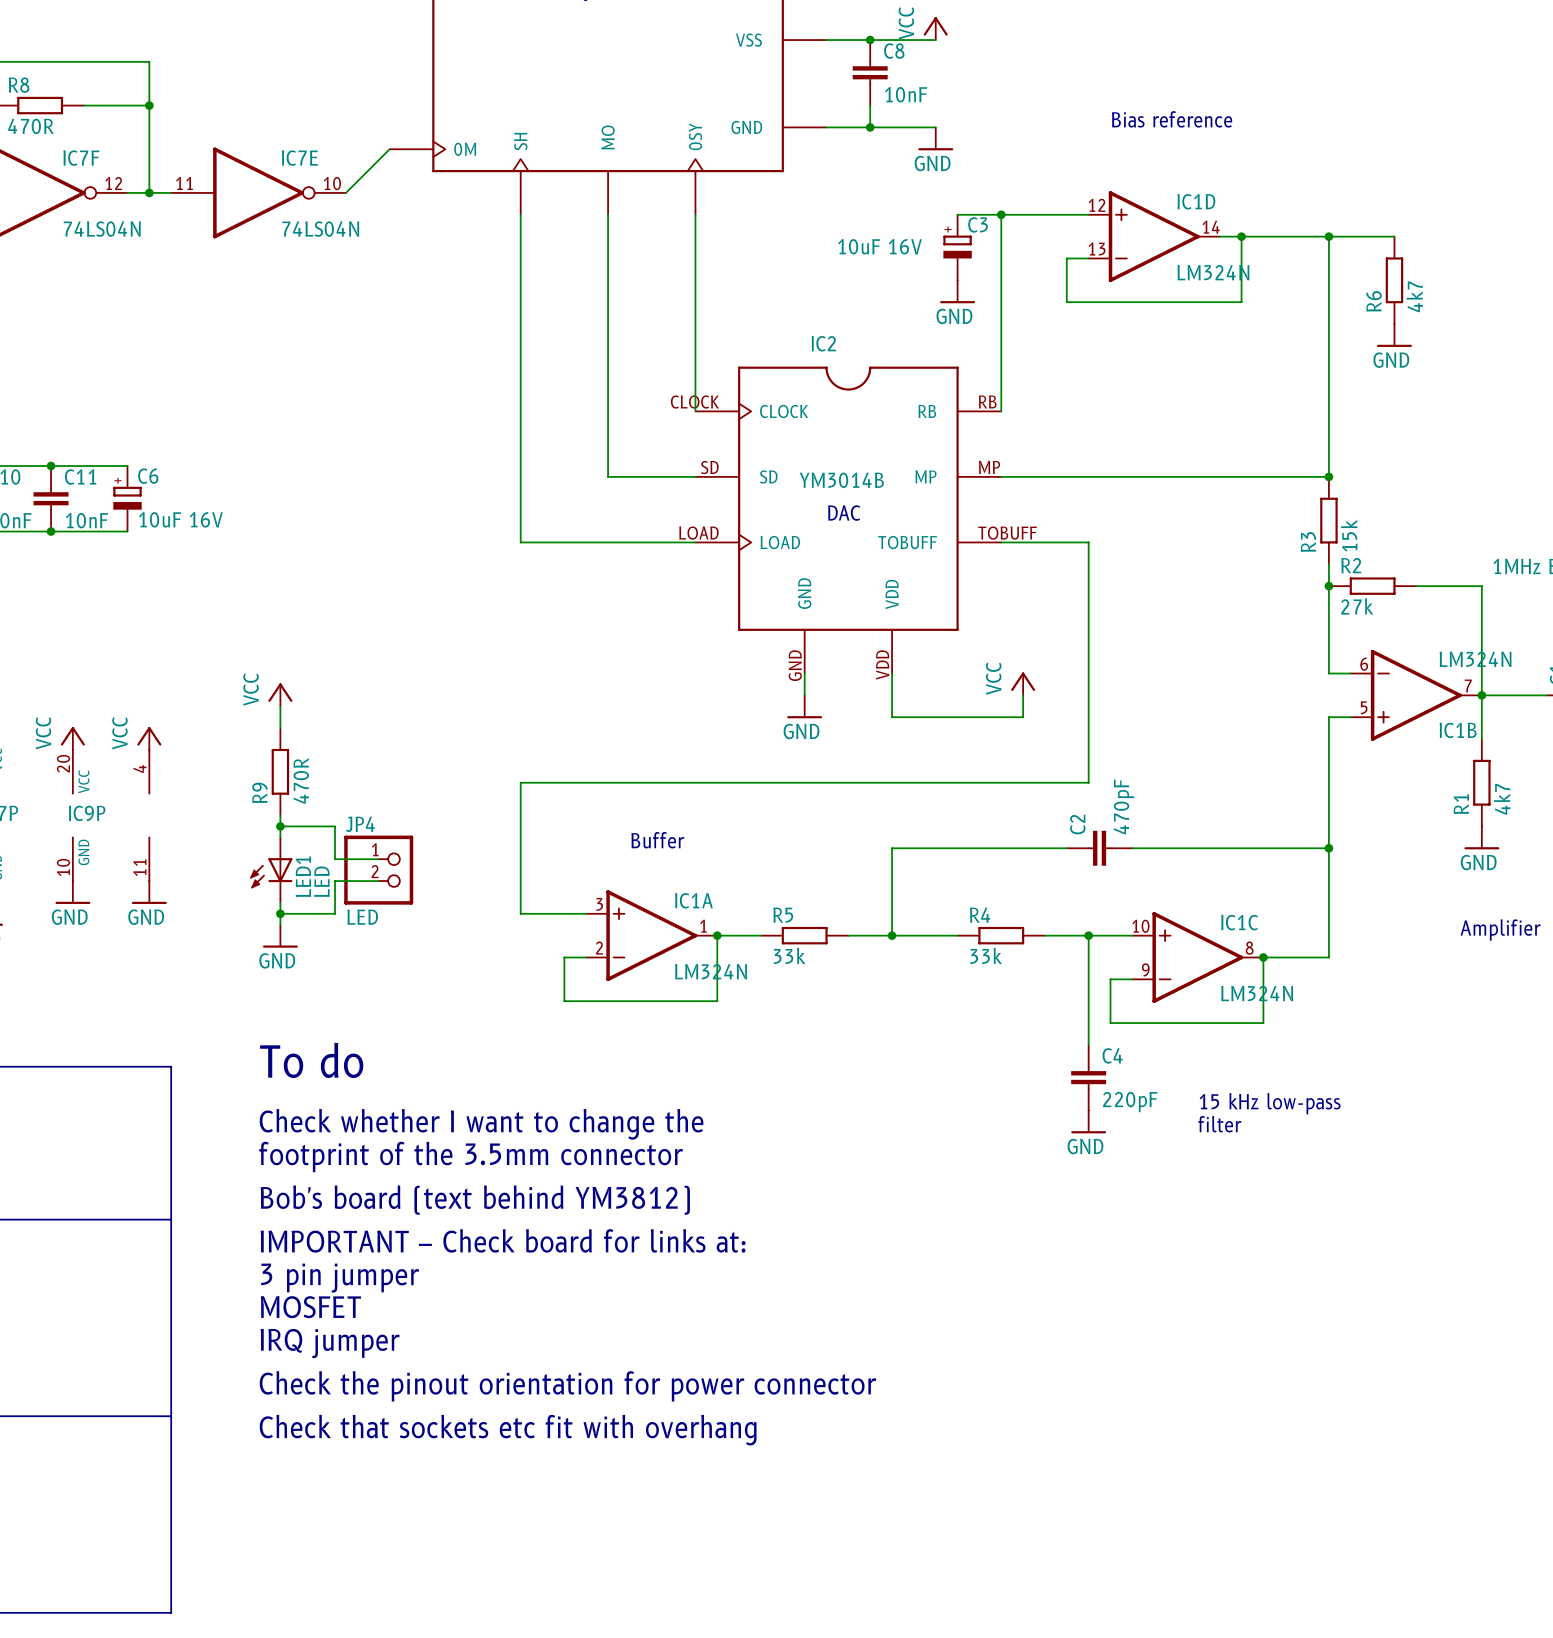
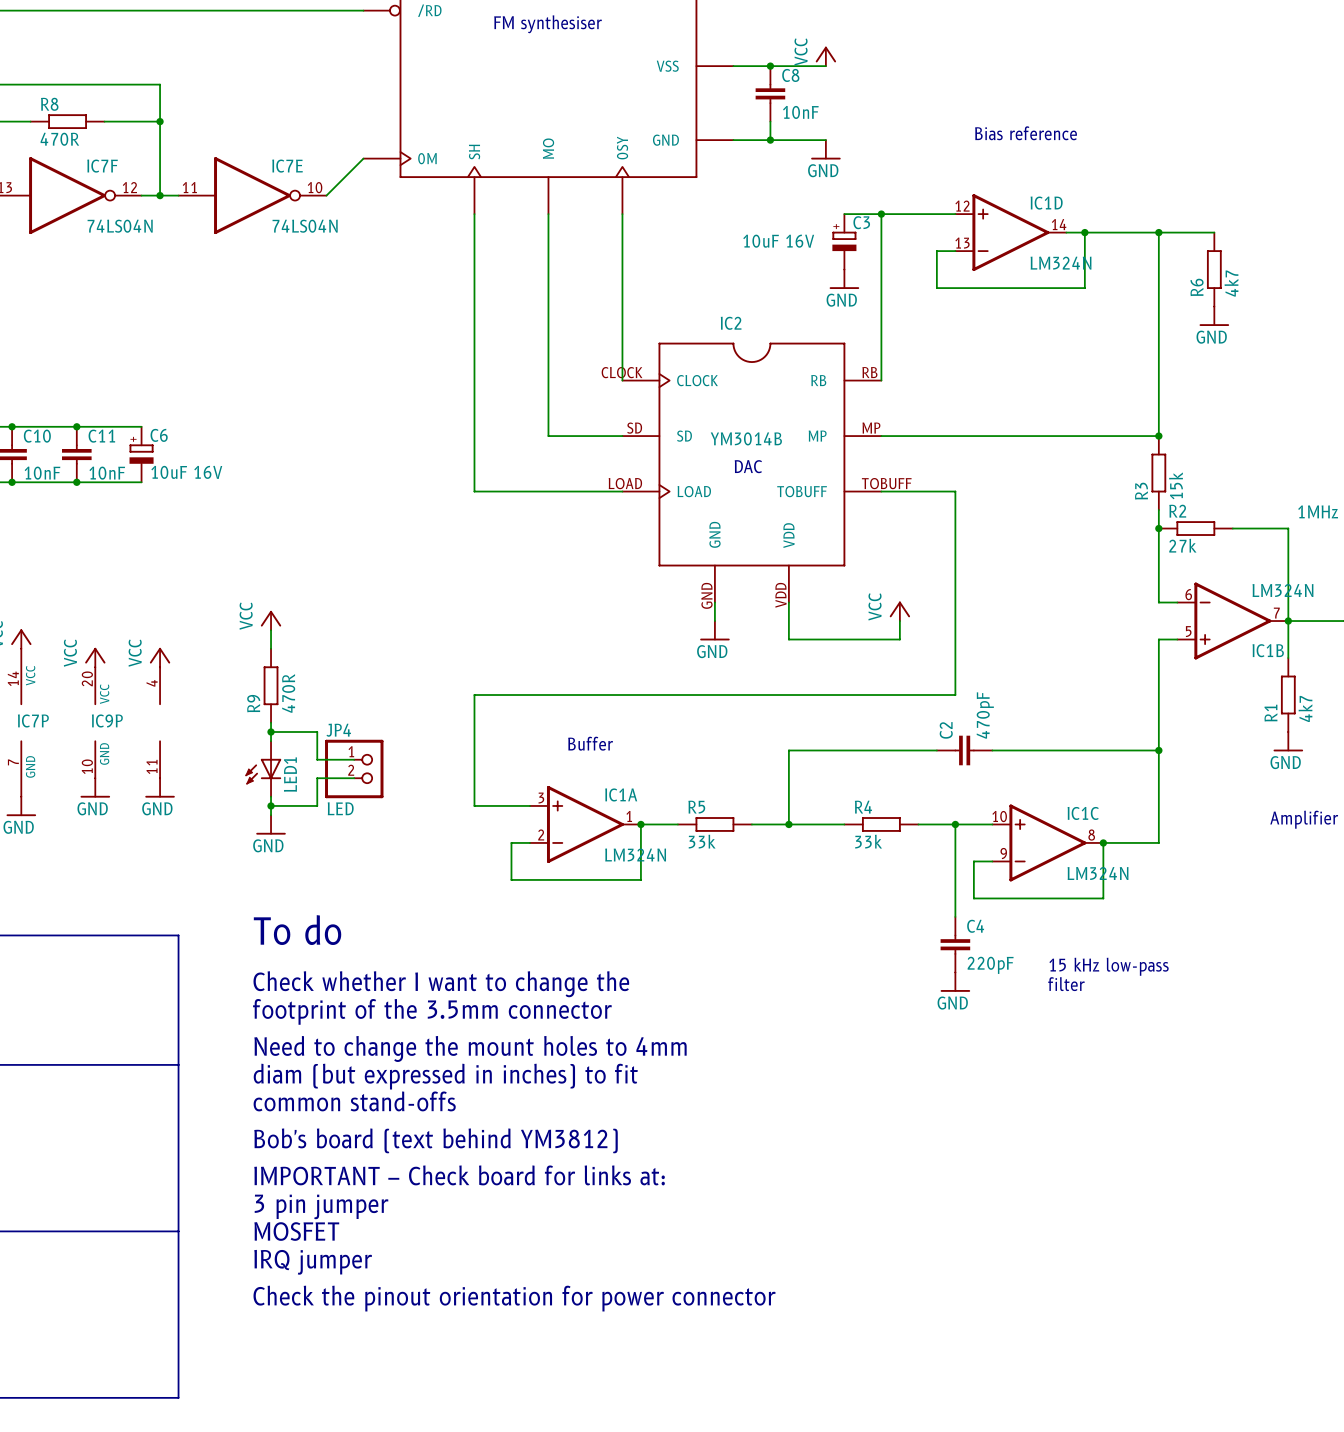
LED1 value: LED (321, 881) -> none
text: Bob's board (text behind YM3812) (475, 1200) -> Need to change the mount holes to 4mm (470, 1048)
text: none -> diam (but expressed in inches) to fit (445, 1076)
text position: IMPORTANT – Check board for links at: (503, 1240) -> IMPORTANT – Check board for links at: (459, 1175)
text: none -> common stand-offs (354, 1101)
text: 3 pin jumper (340, 1278) -> none
text: MOSFET (310, 1307) -> Bob's board (text behind YM3812) (436, 1140)
text position: IRQ jumper (330, 1343) -> IRQ jumper (313, 1262)
text: Check the pinout orientation for power connector (567, 1386) -> 3 pin jumper (321, 1206)
text: none -> MOSFET (296, 1231)
text: Check that sockets etc fit with overhang (508, 1430) -> none
text: none -> Check the pinout orientation for power connector (514, 1298)

